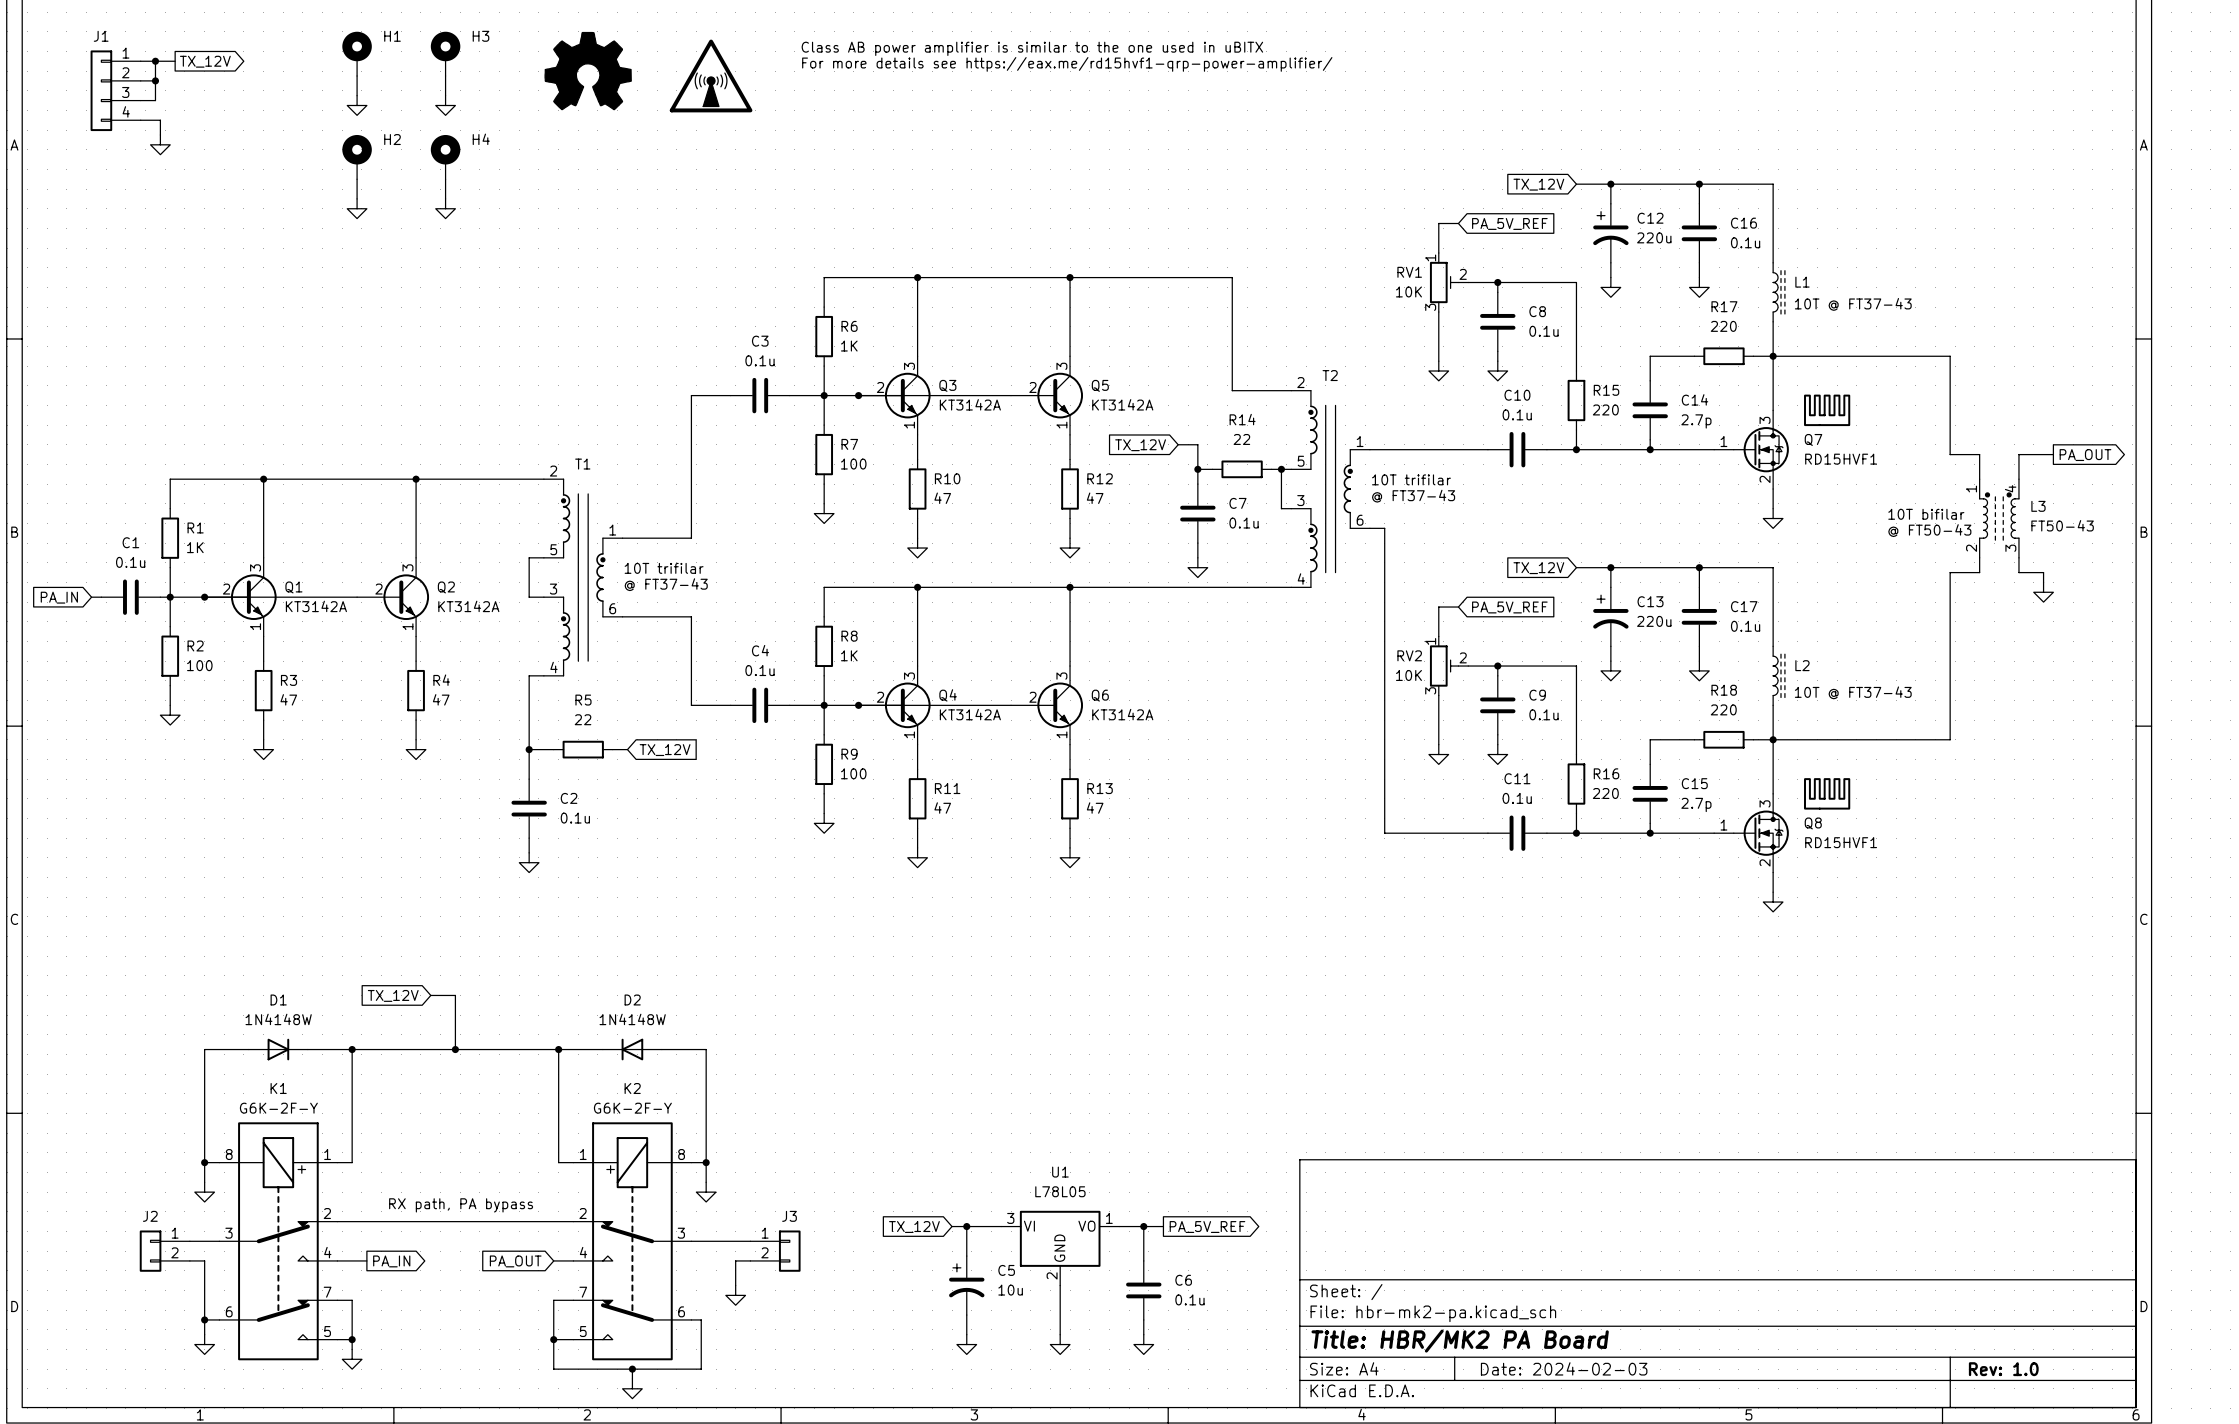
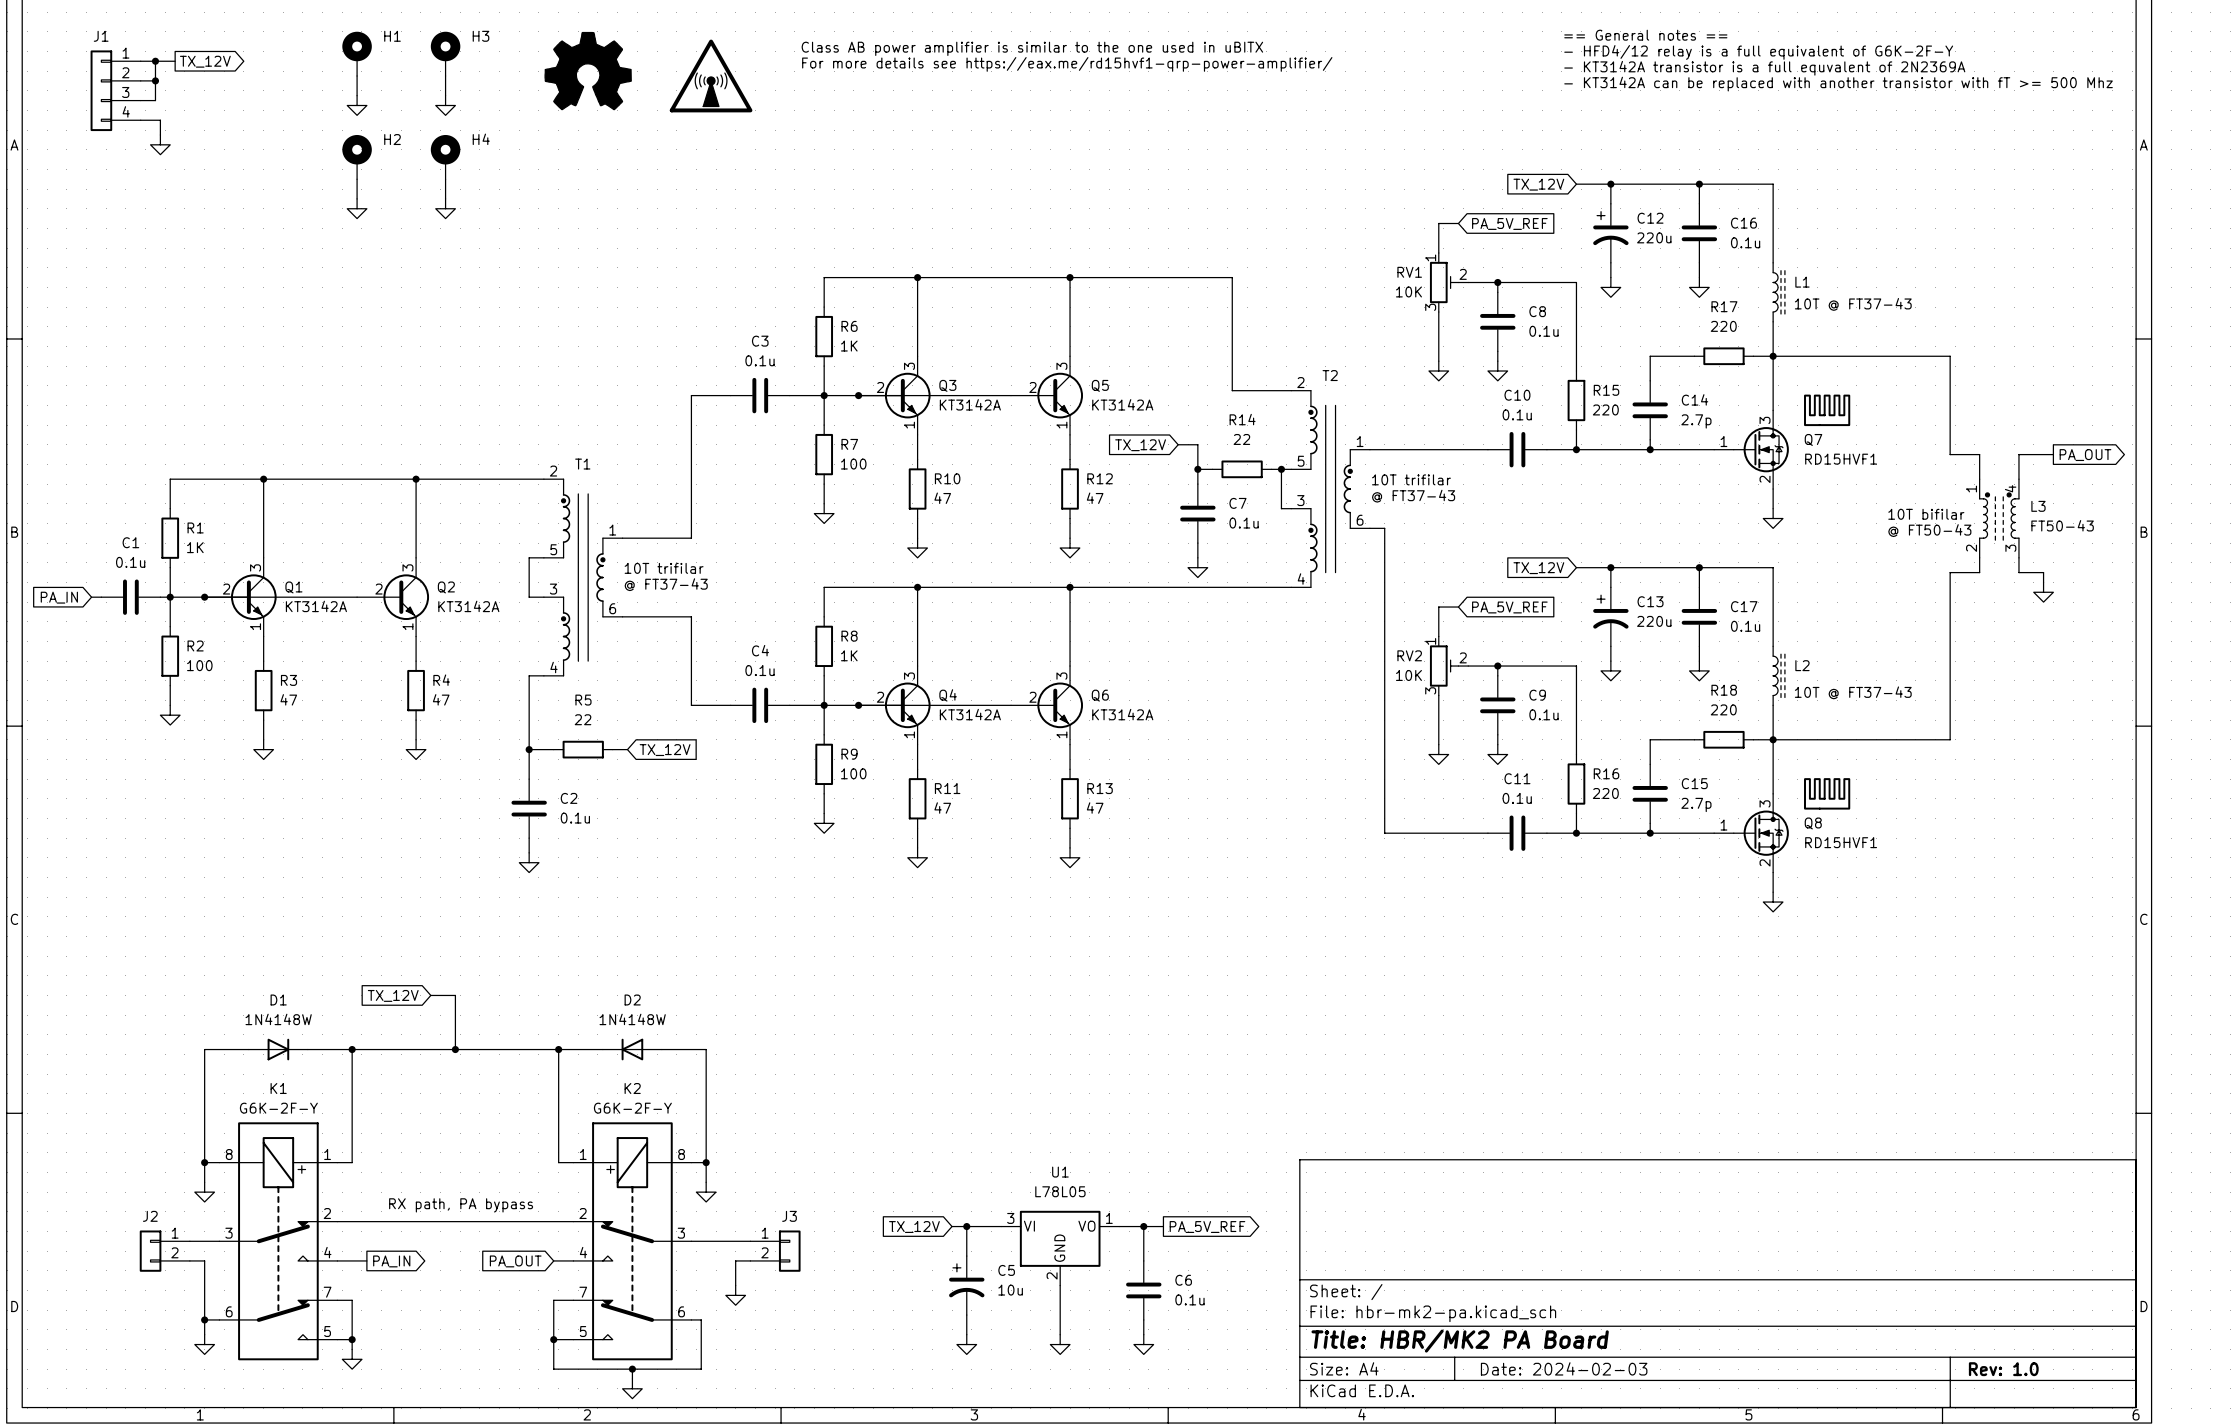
text: none -> == General notes == (1645, 35)
text: none -> - HFD4/12 relay is a full equivalent of G6K-2F-Y (1758, 52)
text: none -> - KT3142A transistor is a full equvalent of 2N2369A (1764, 68)
text: none -> - KT3142A can be replaced with another transistor with fT >= 500 Mhz (1838, 84)

